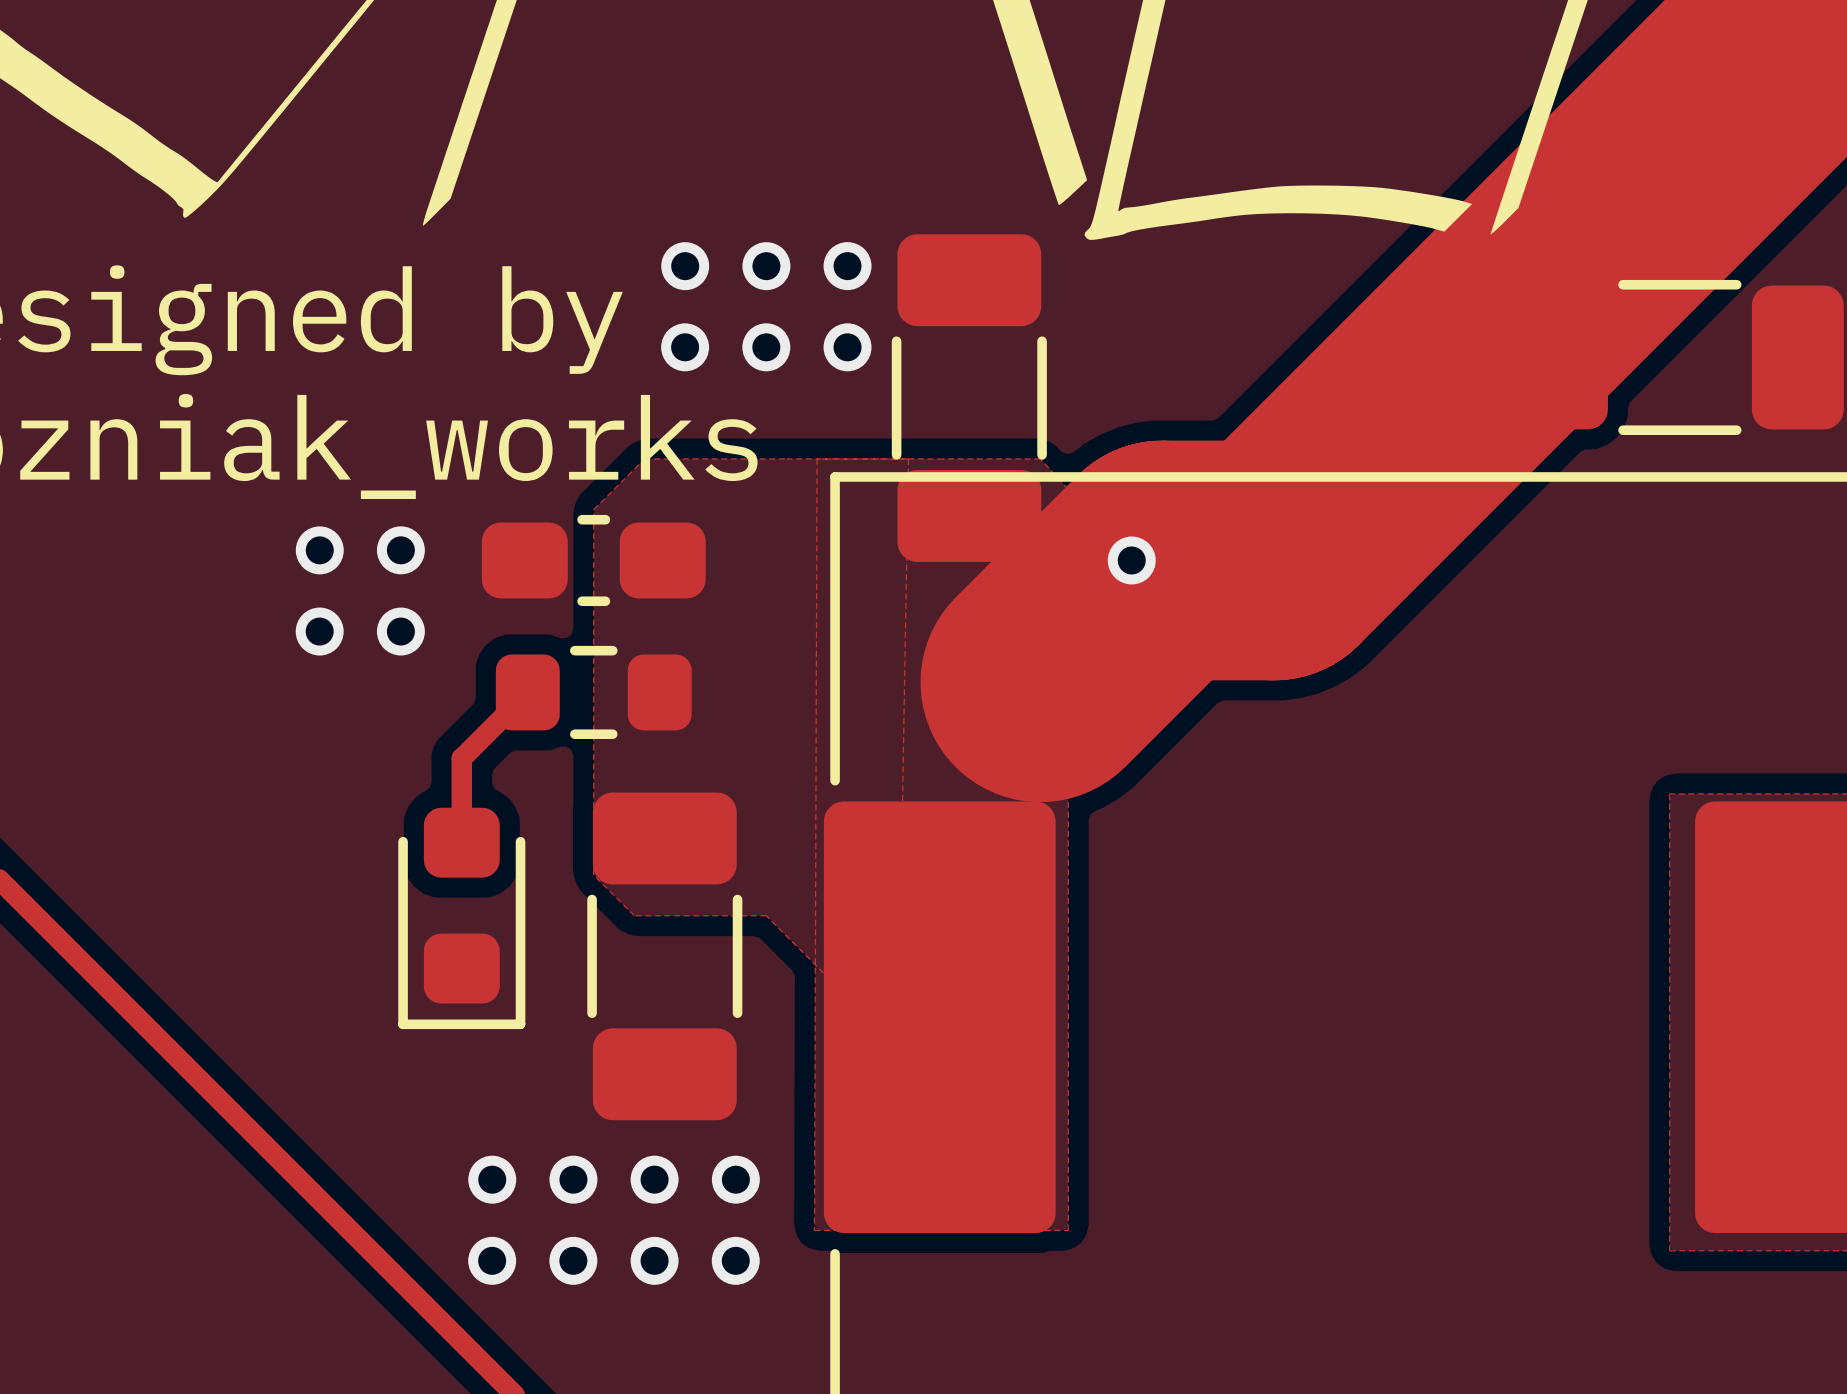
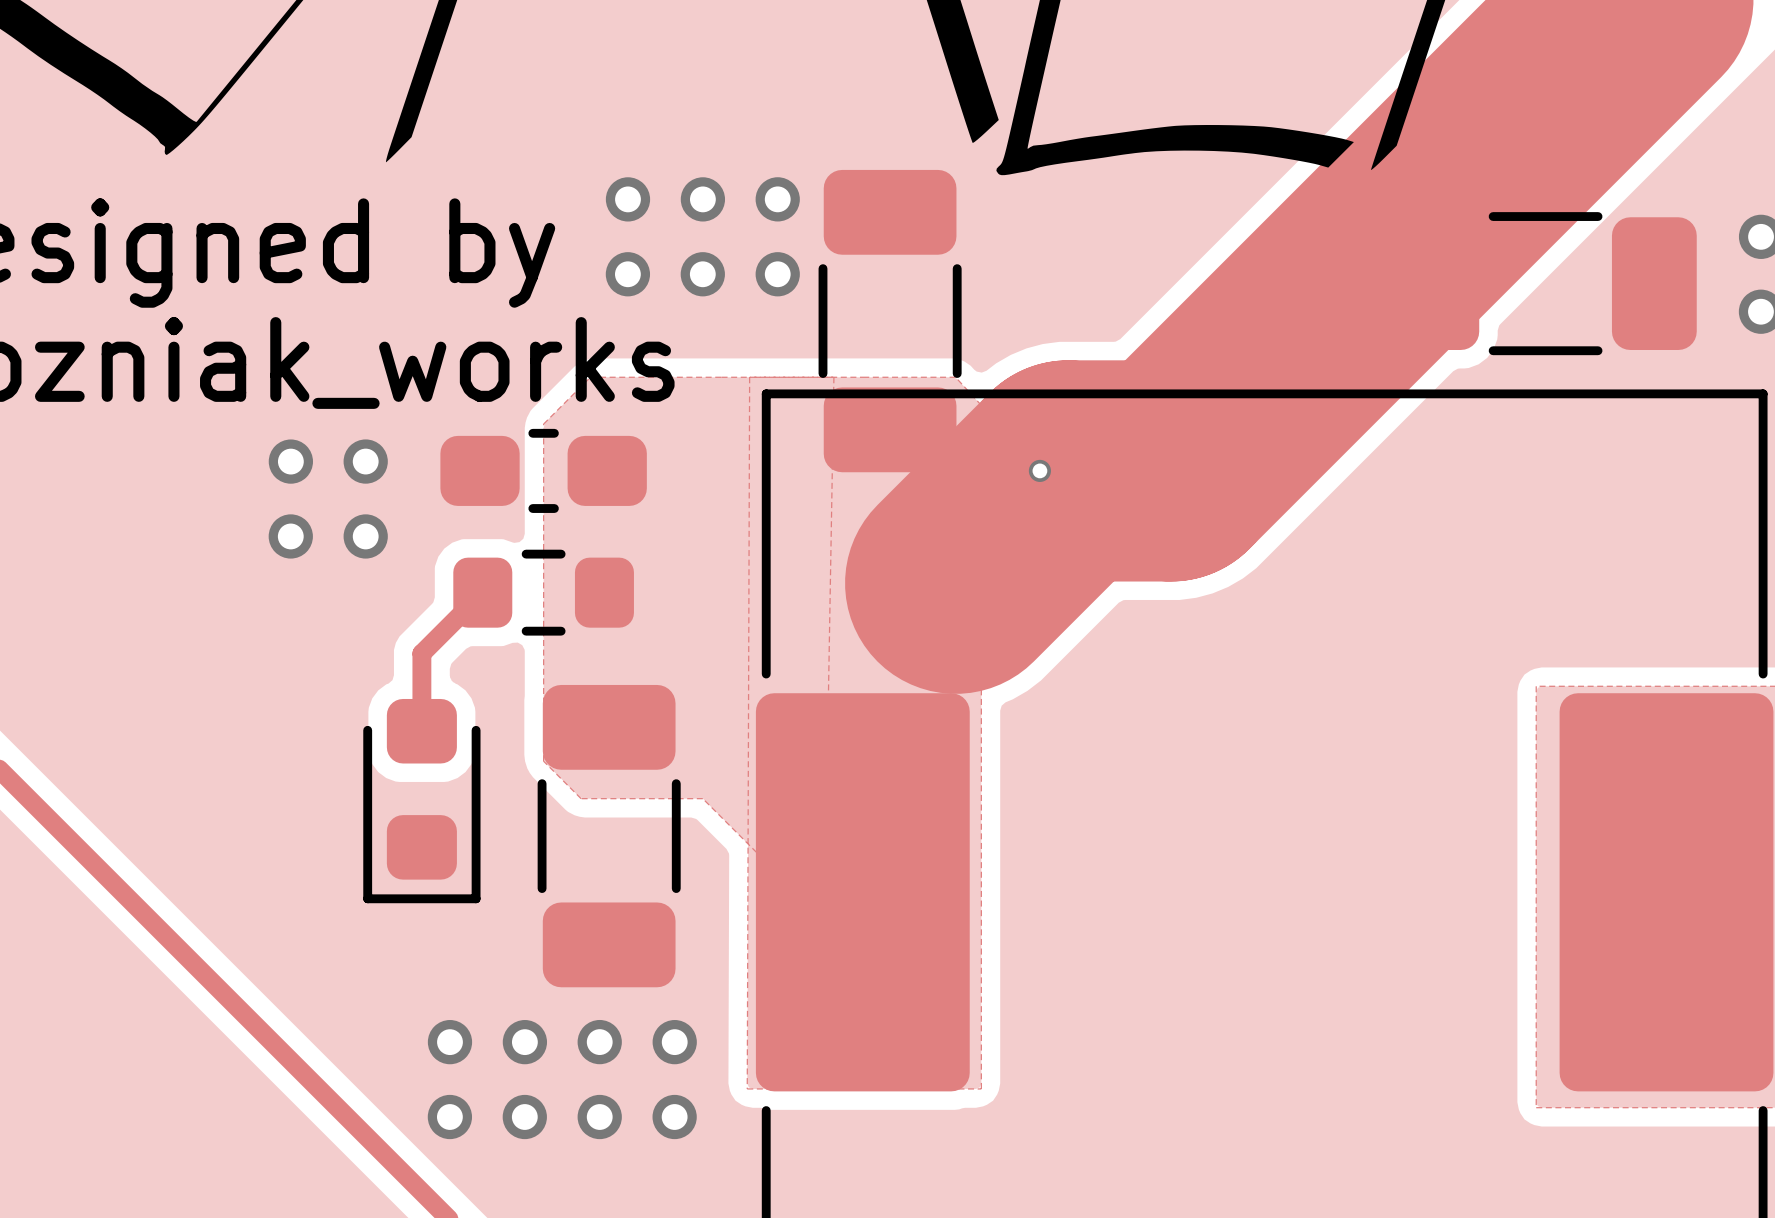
via size: [1107, 536, 1156, 585] -> [1028, 459, 1051, 482]

